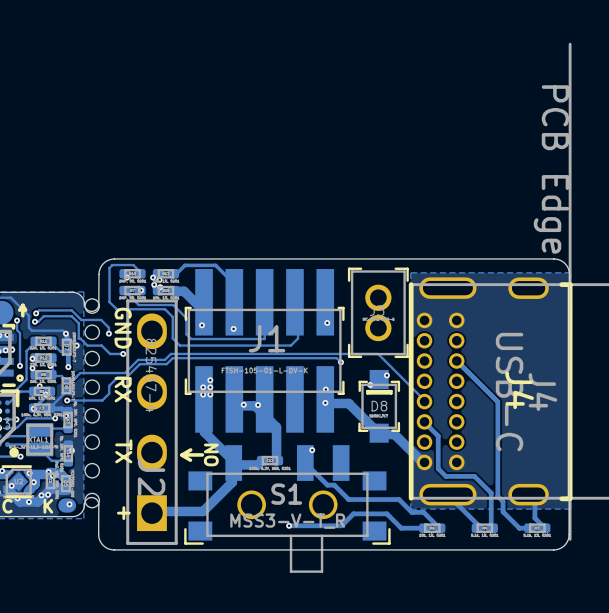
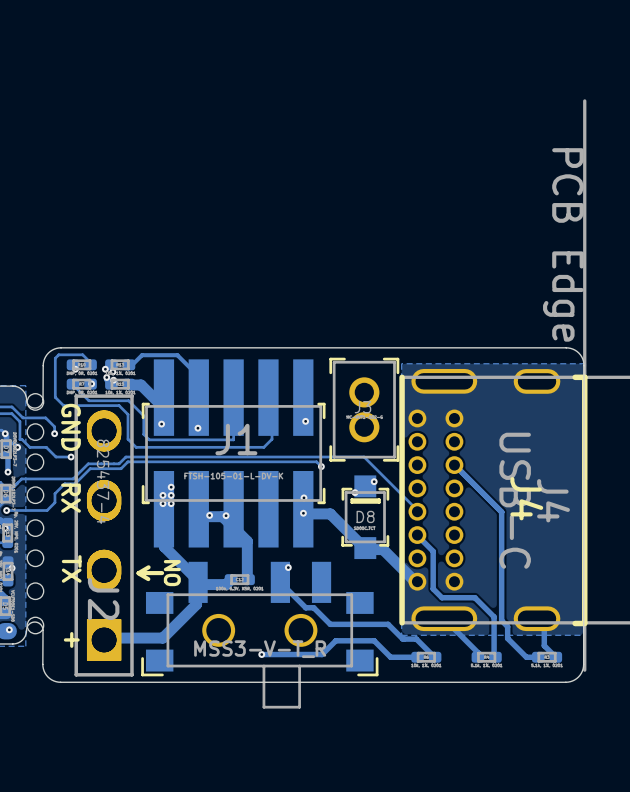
part: none -> (104, 535)
S1 name: S1 (286, 494) -> none

